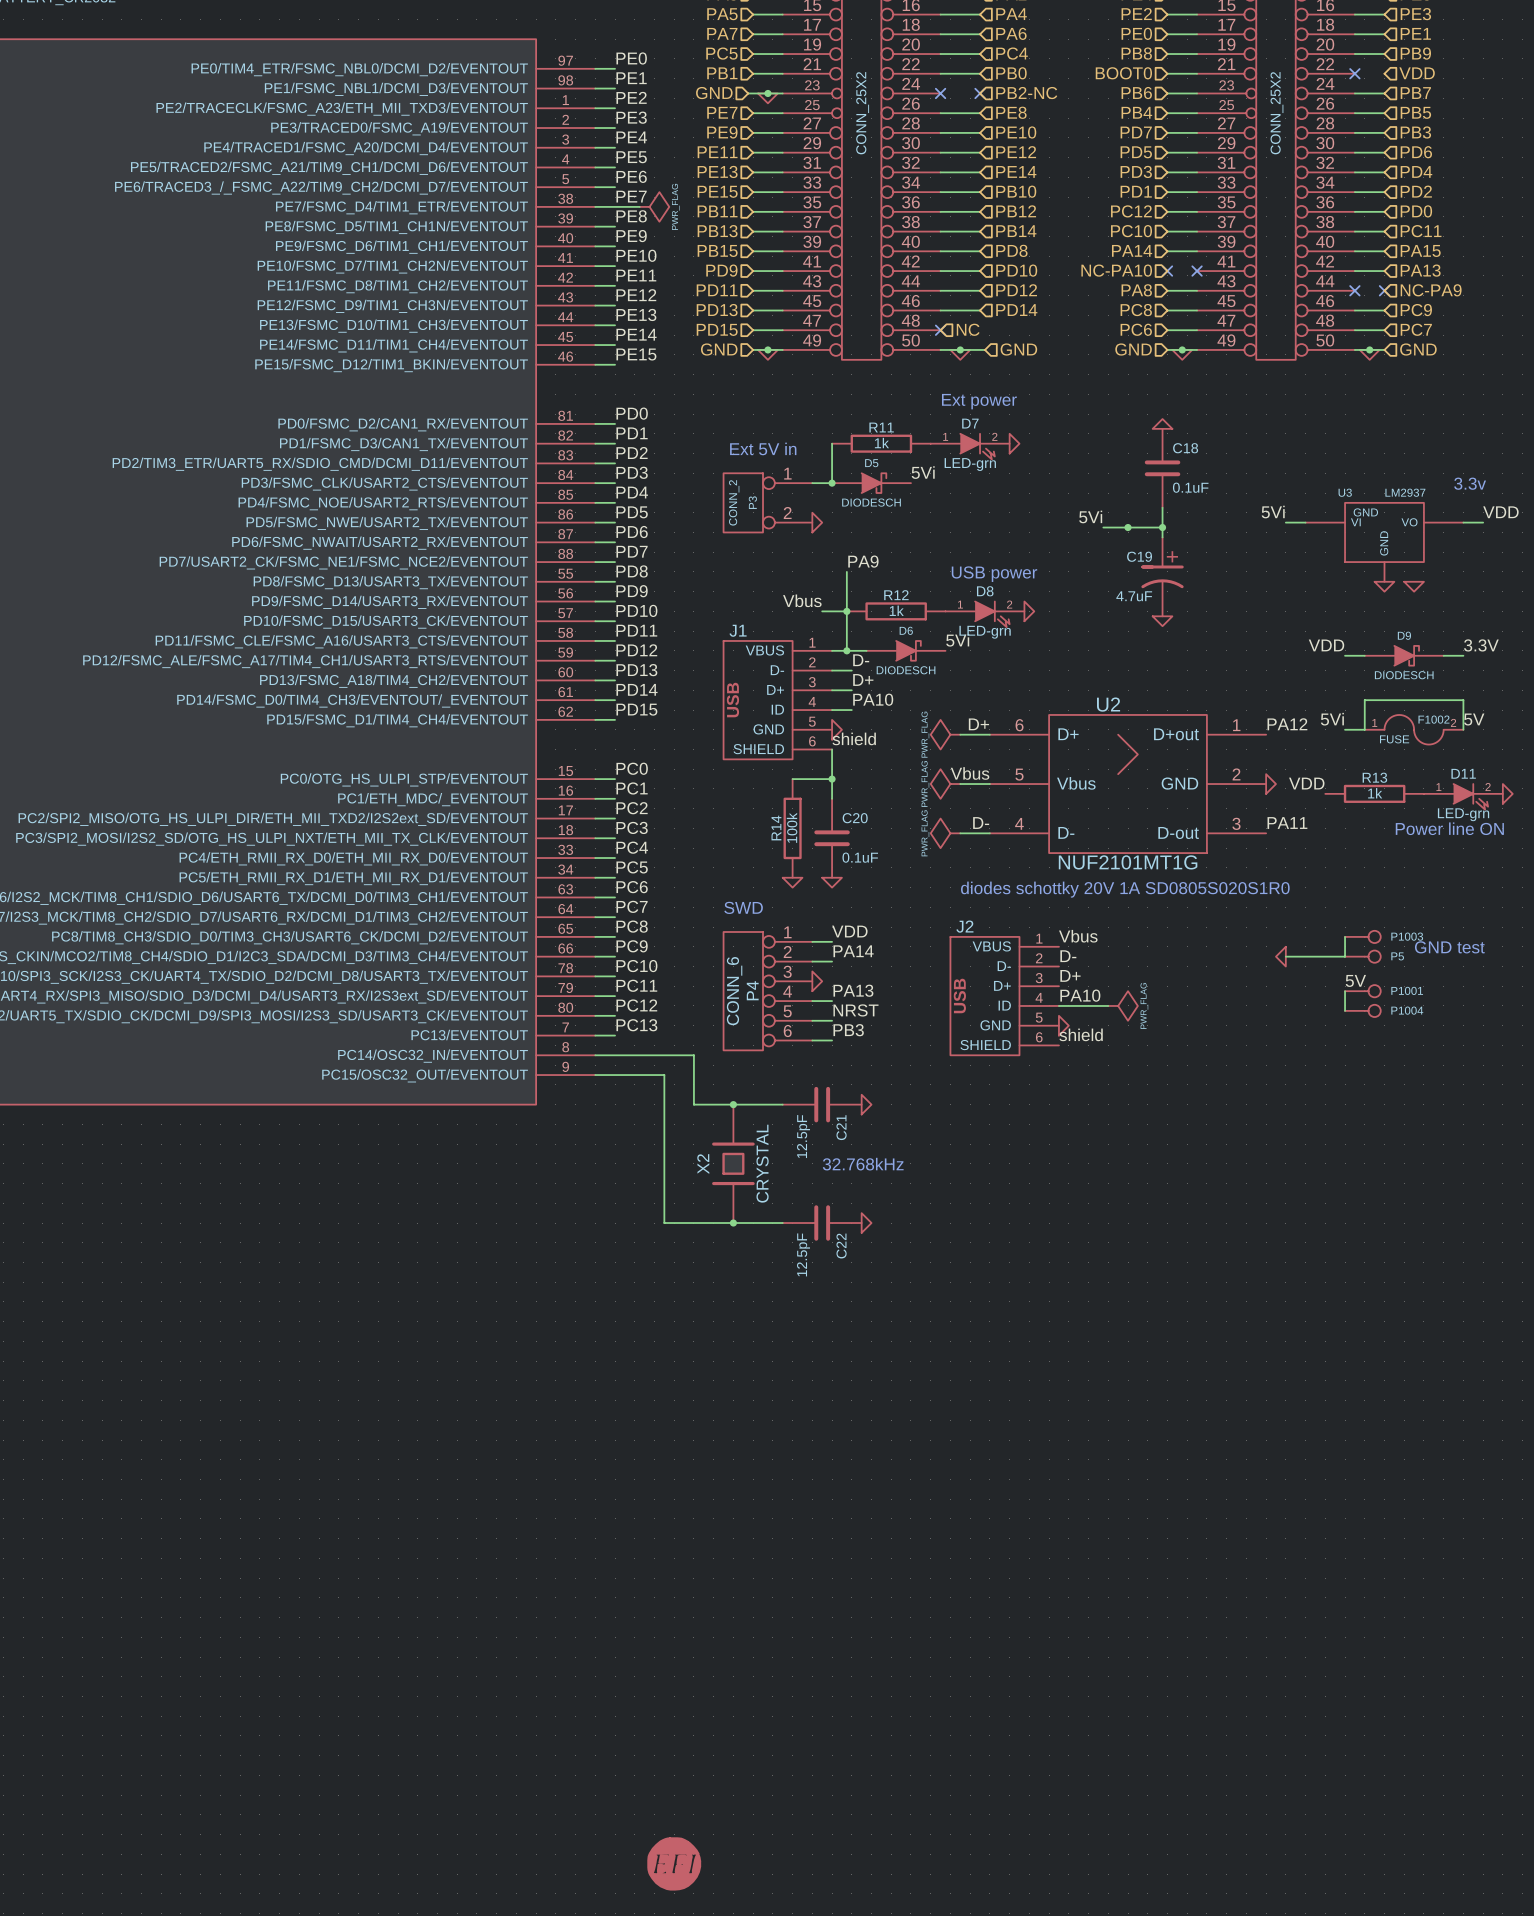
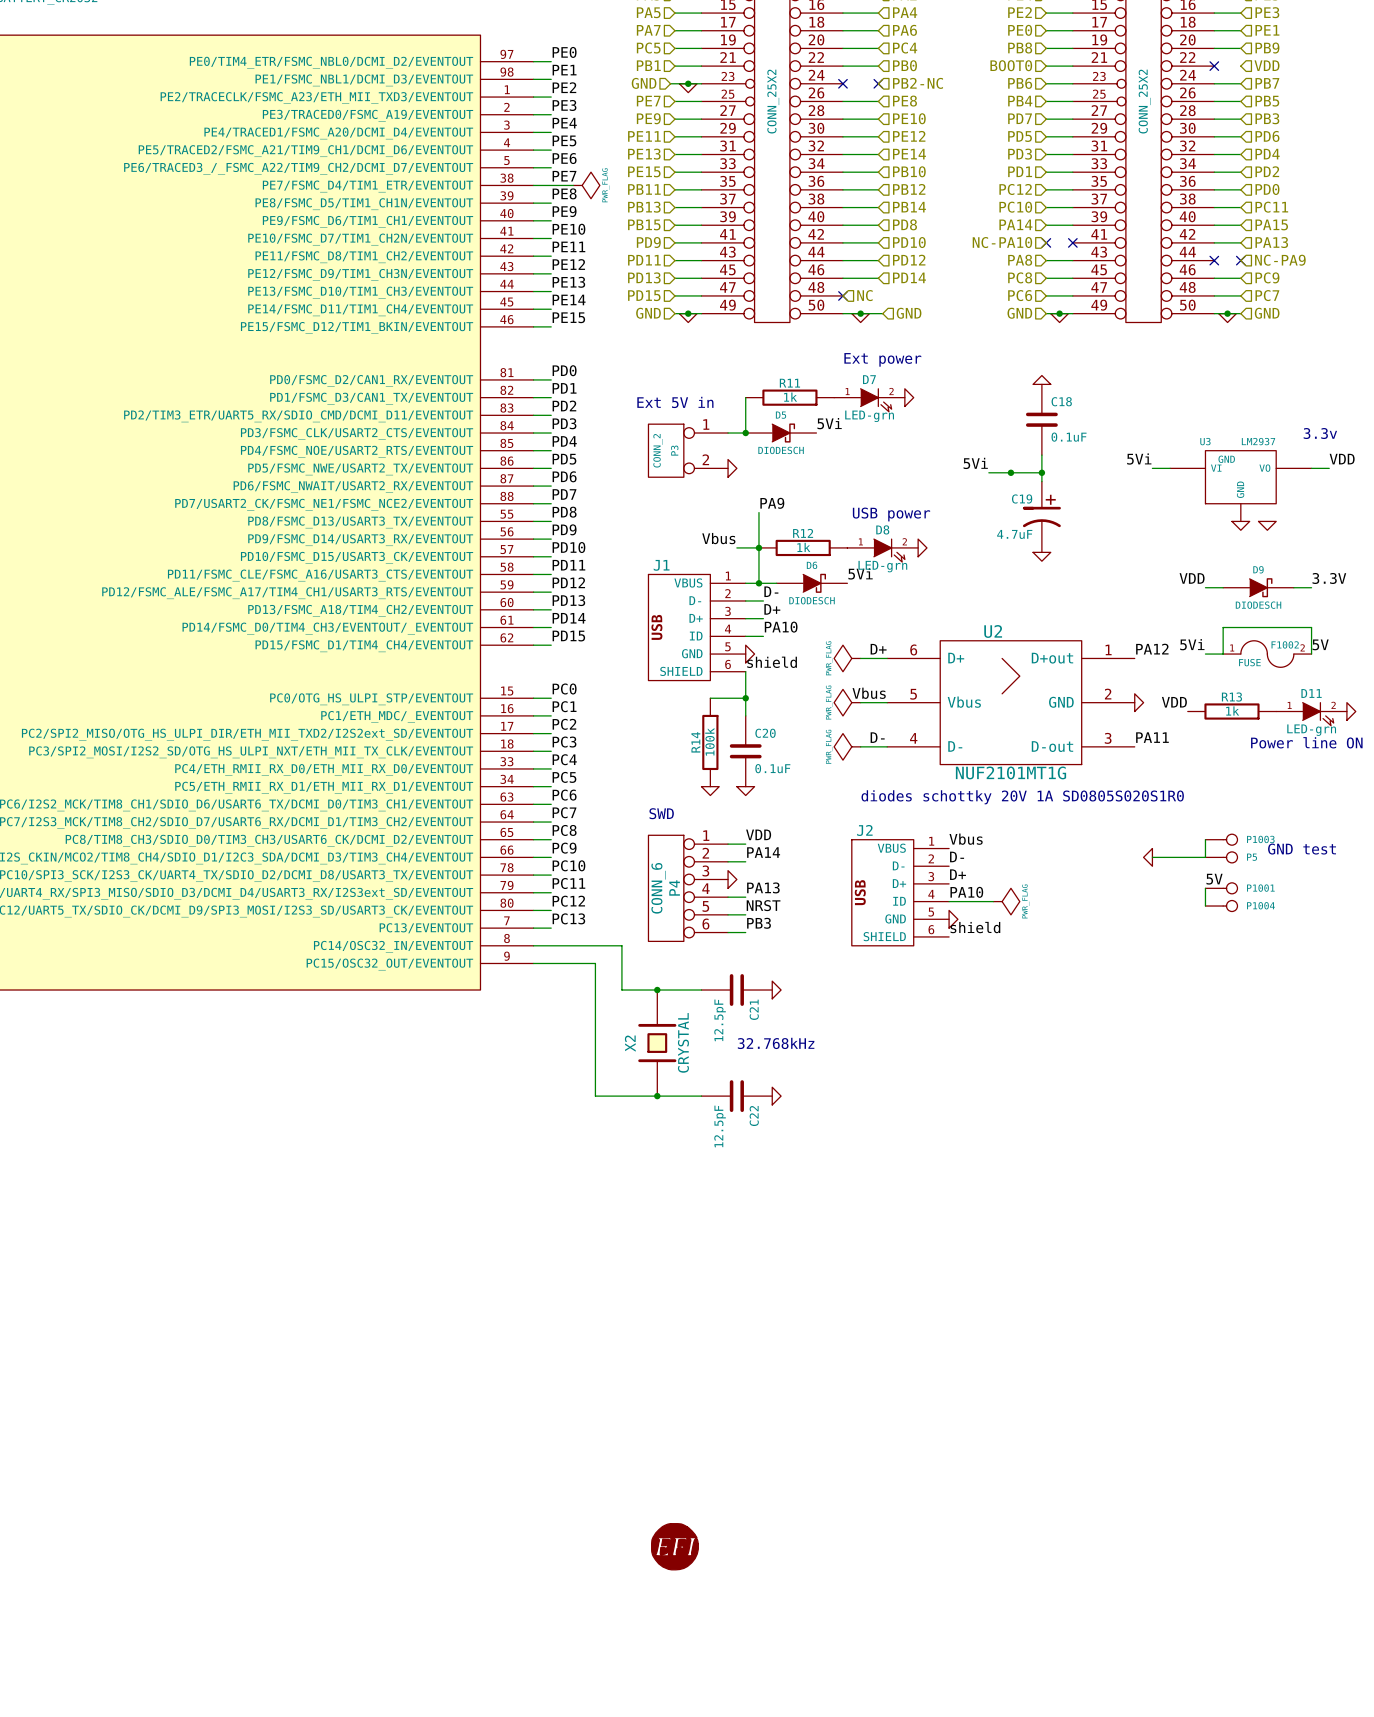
part position: (674, 1863) -> (674, 1546)

